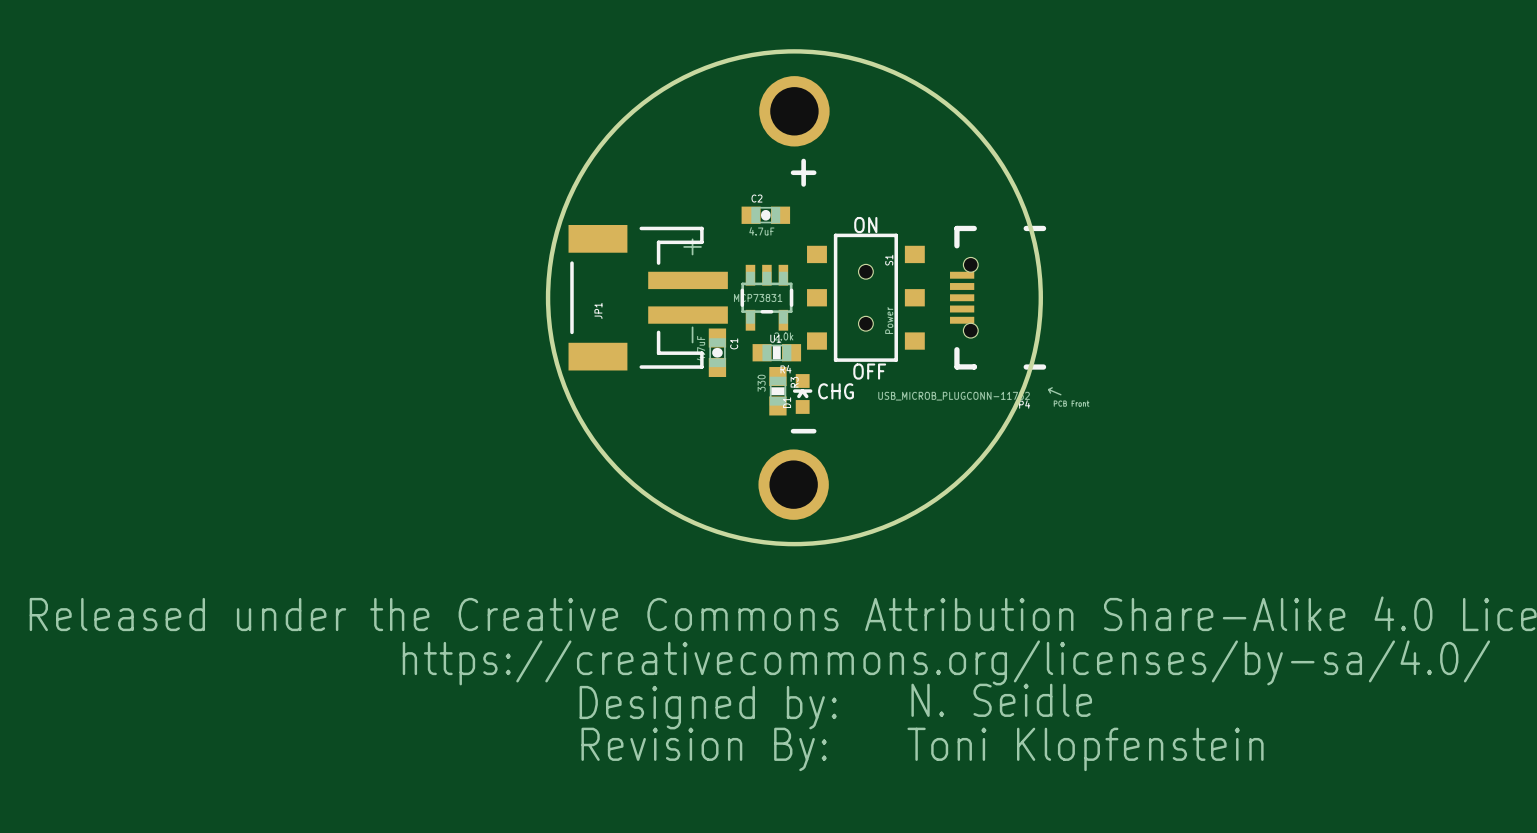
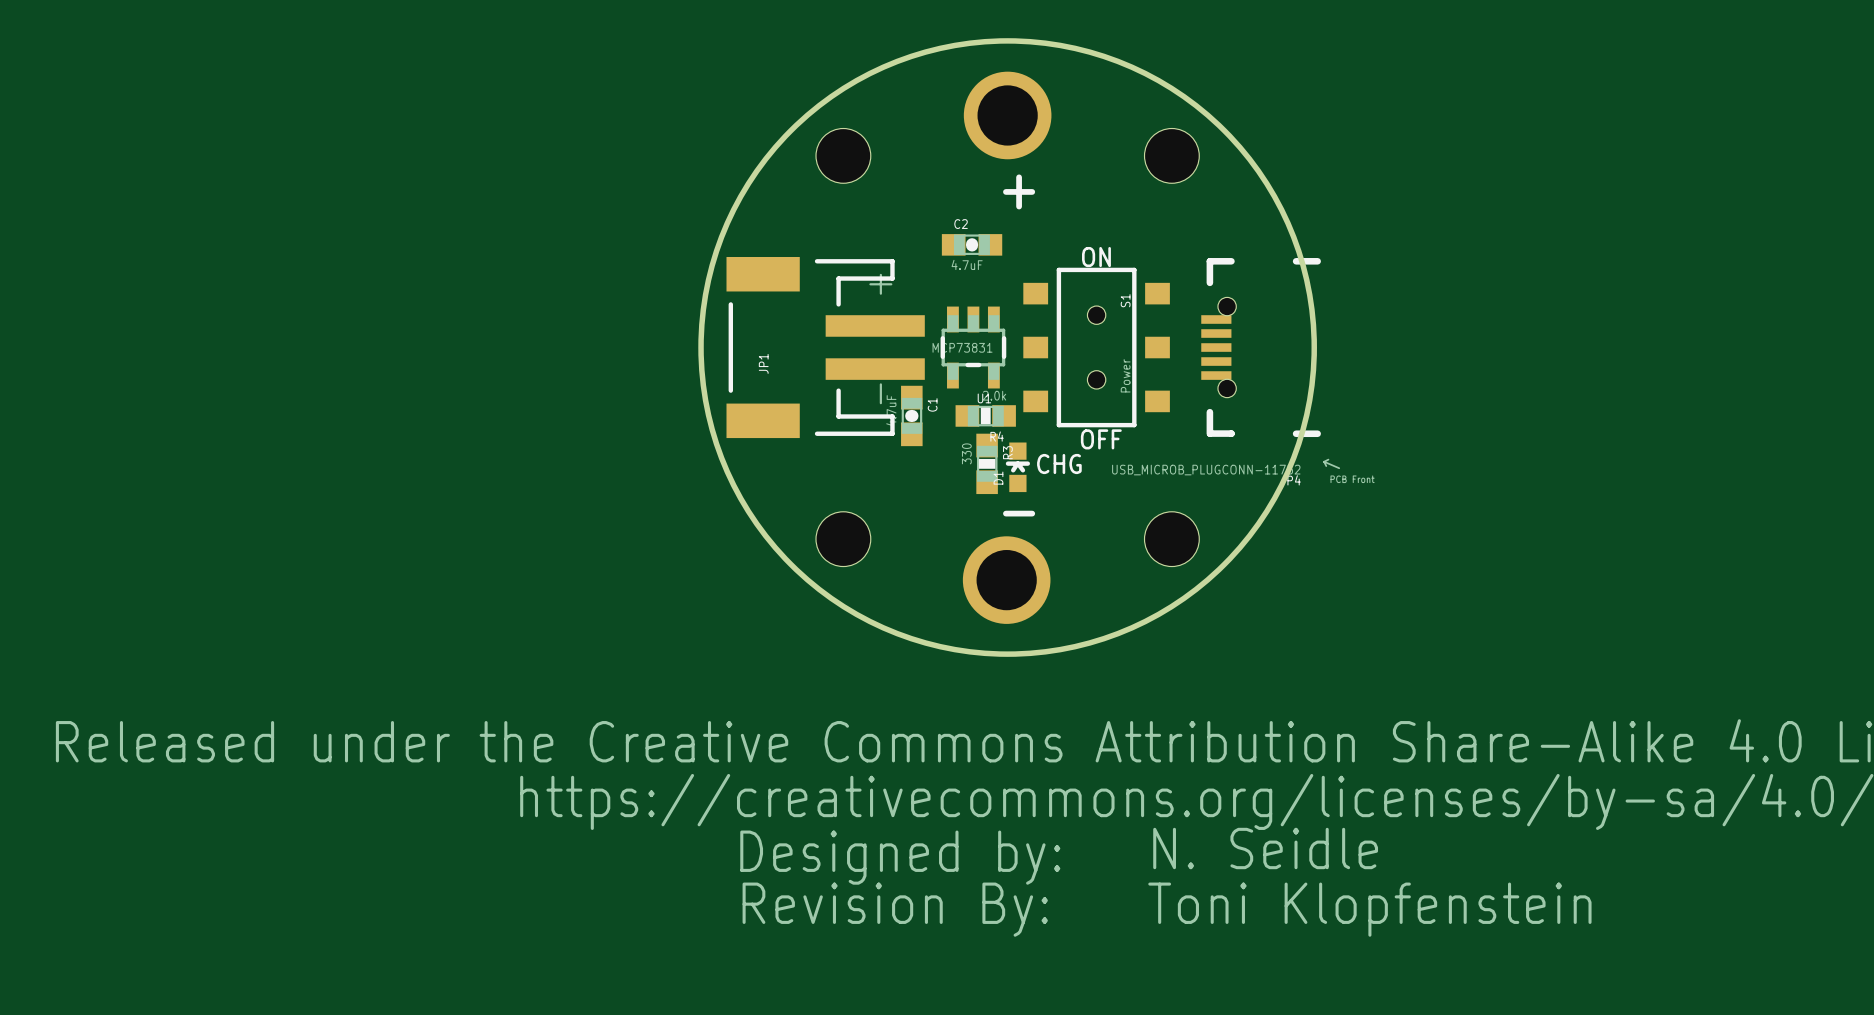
part: none -> (843, 155)
part: none -> (1171, 155)
part: none -> (843, 539)
part: none -> (1171, 539)

